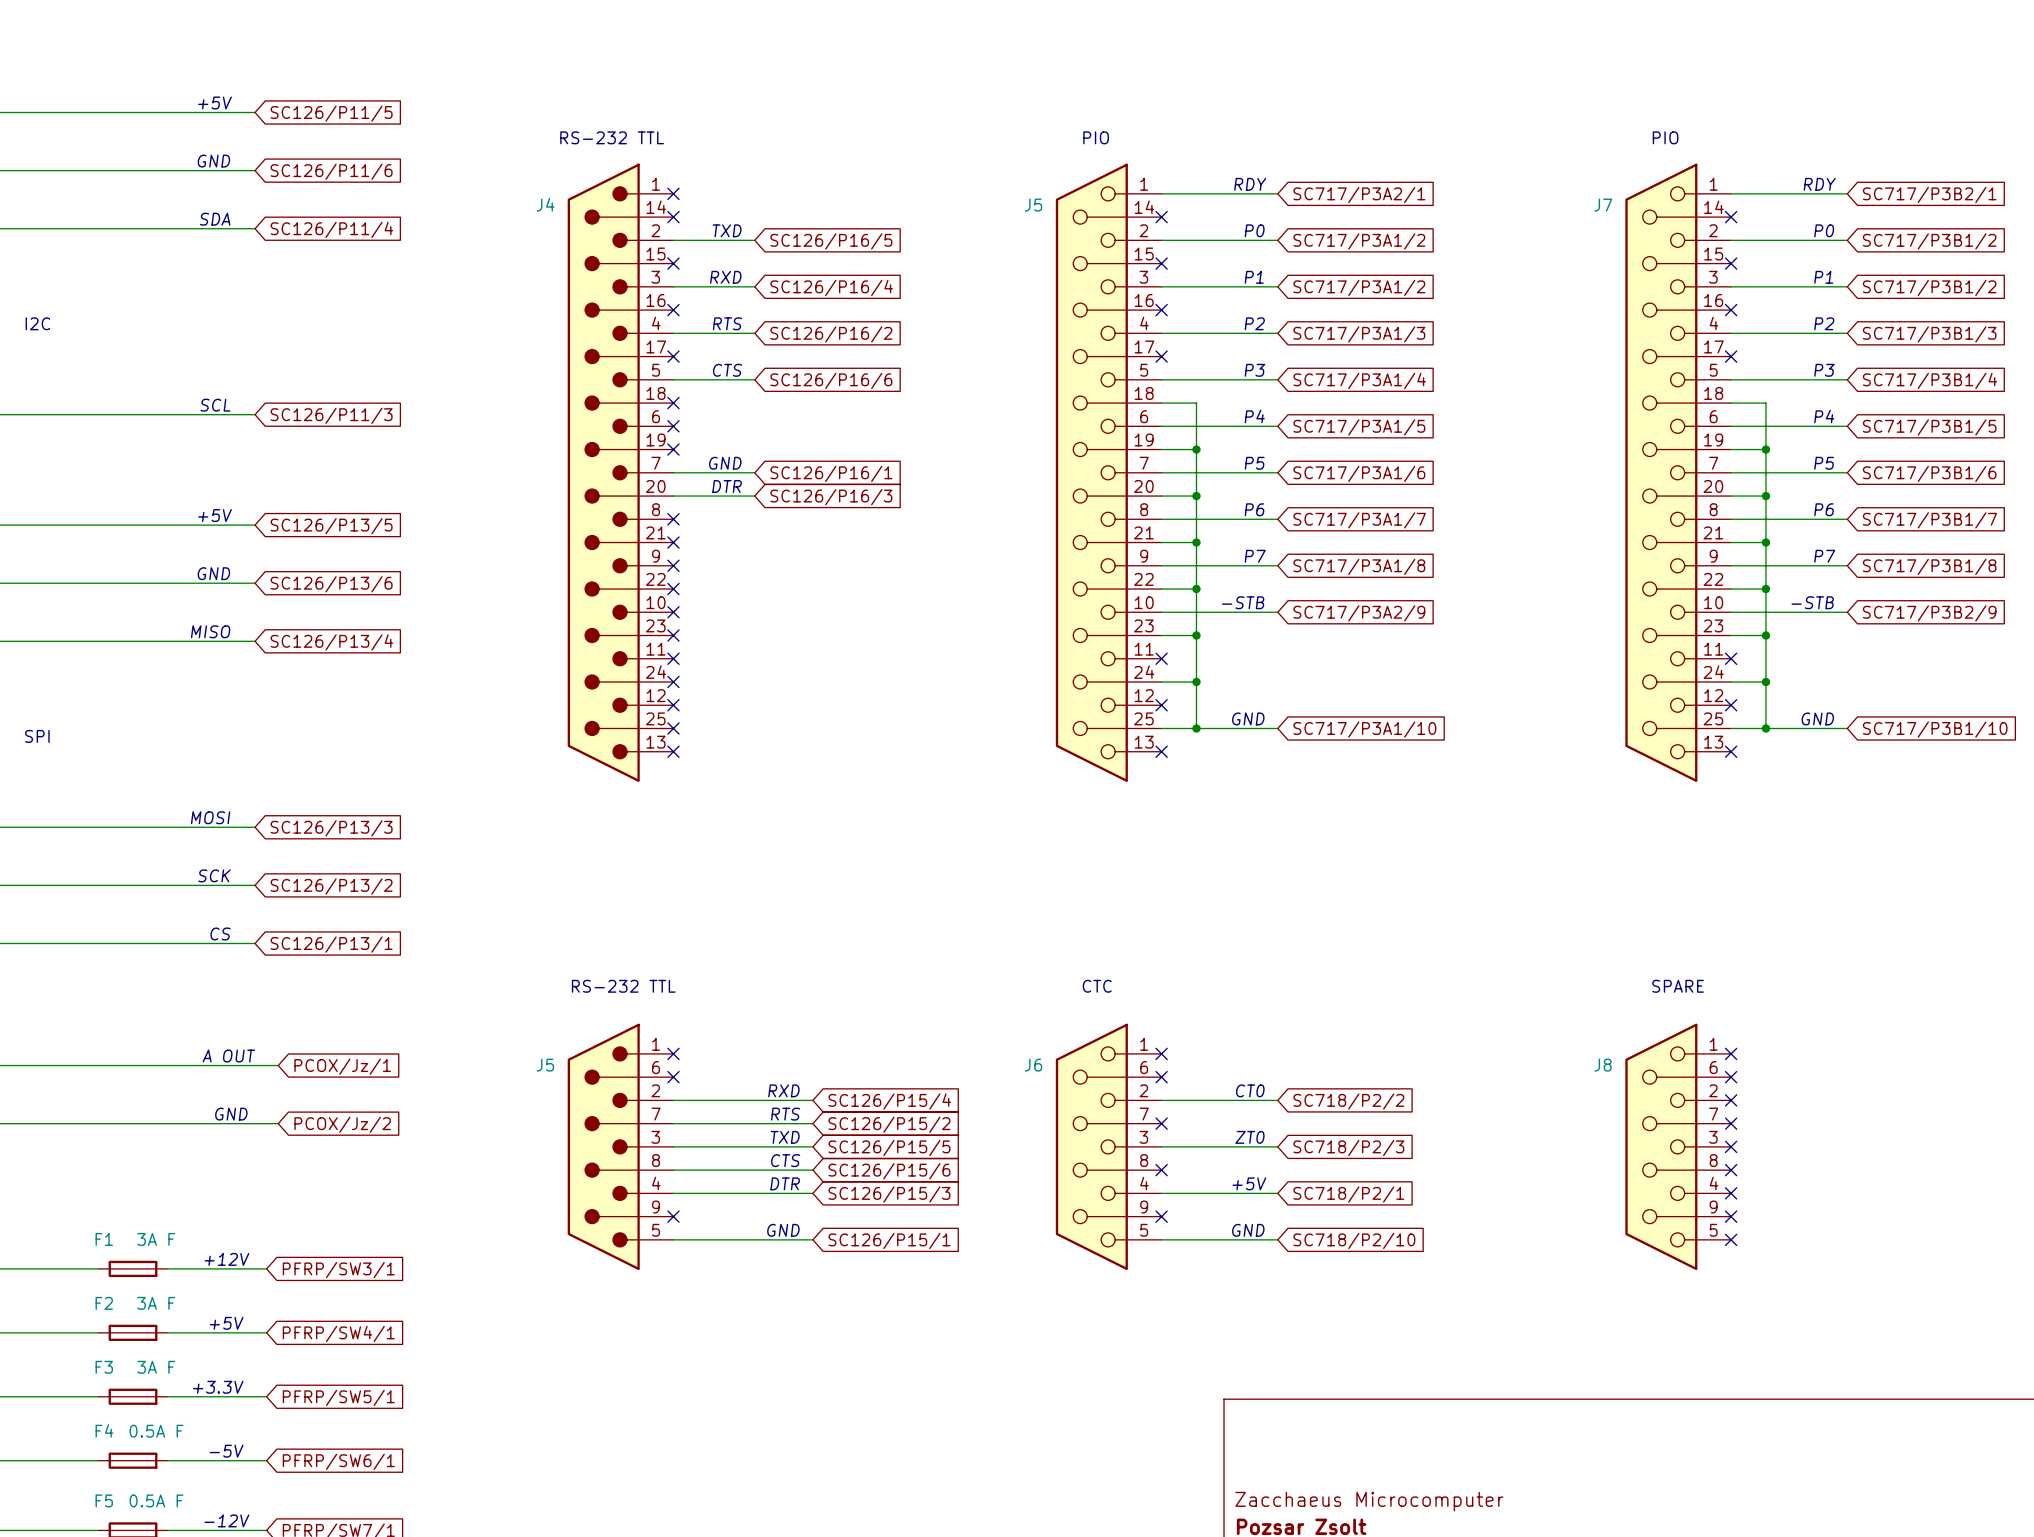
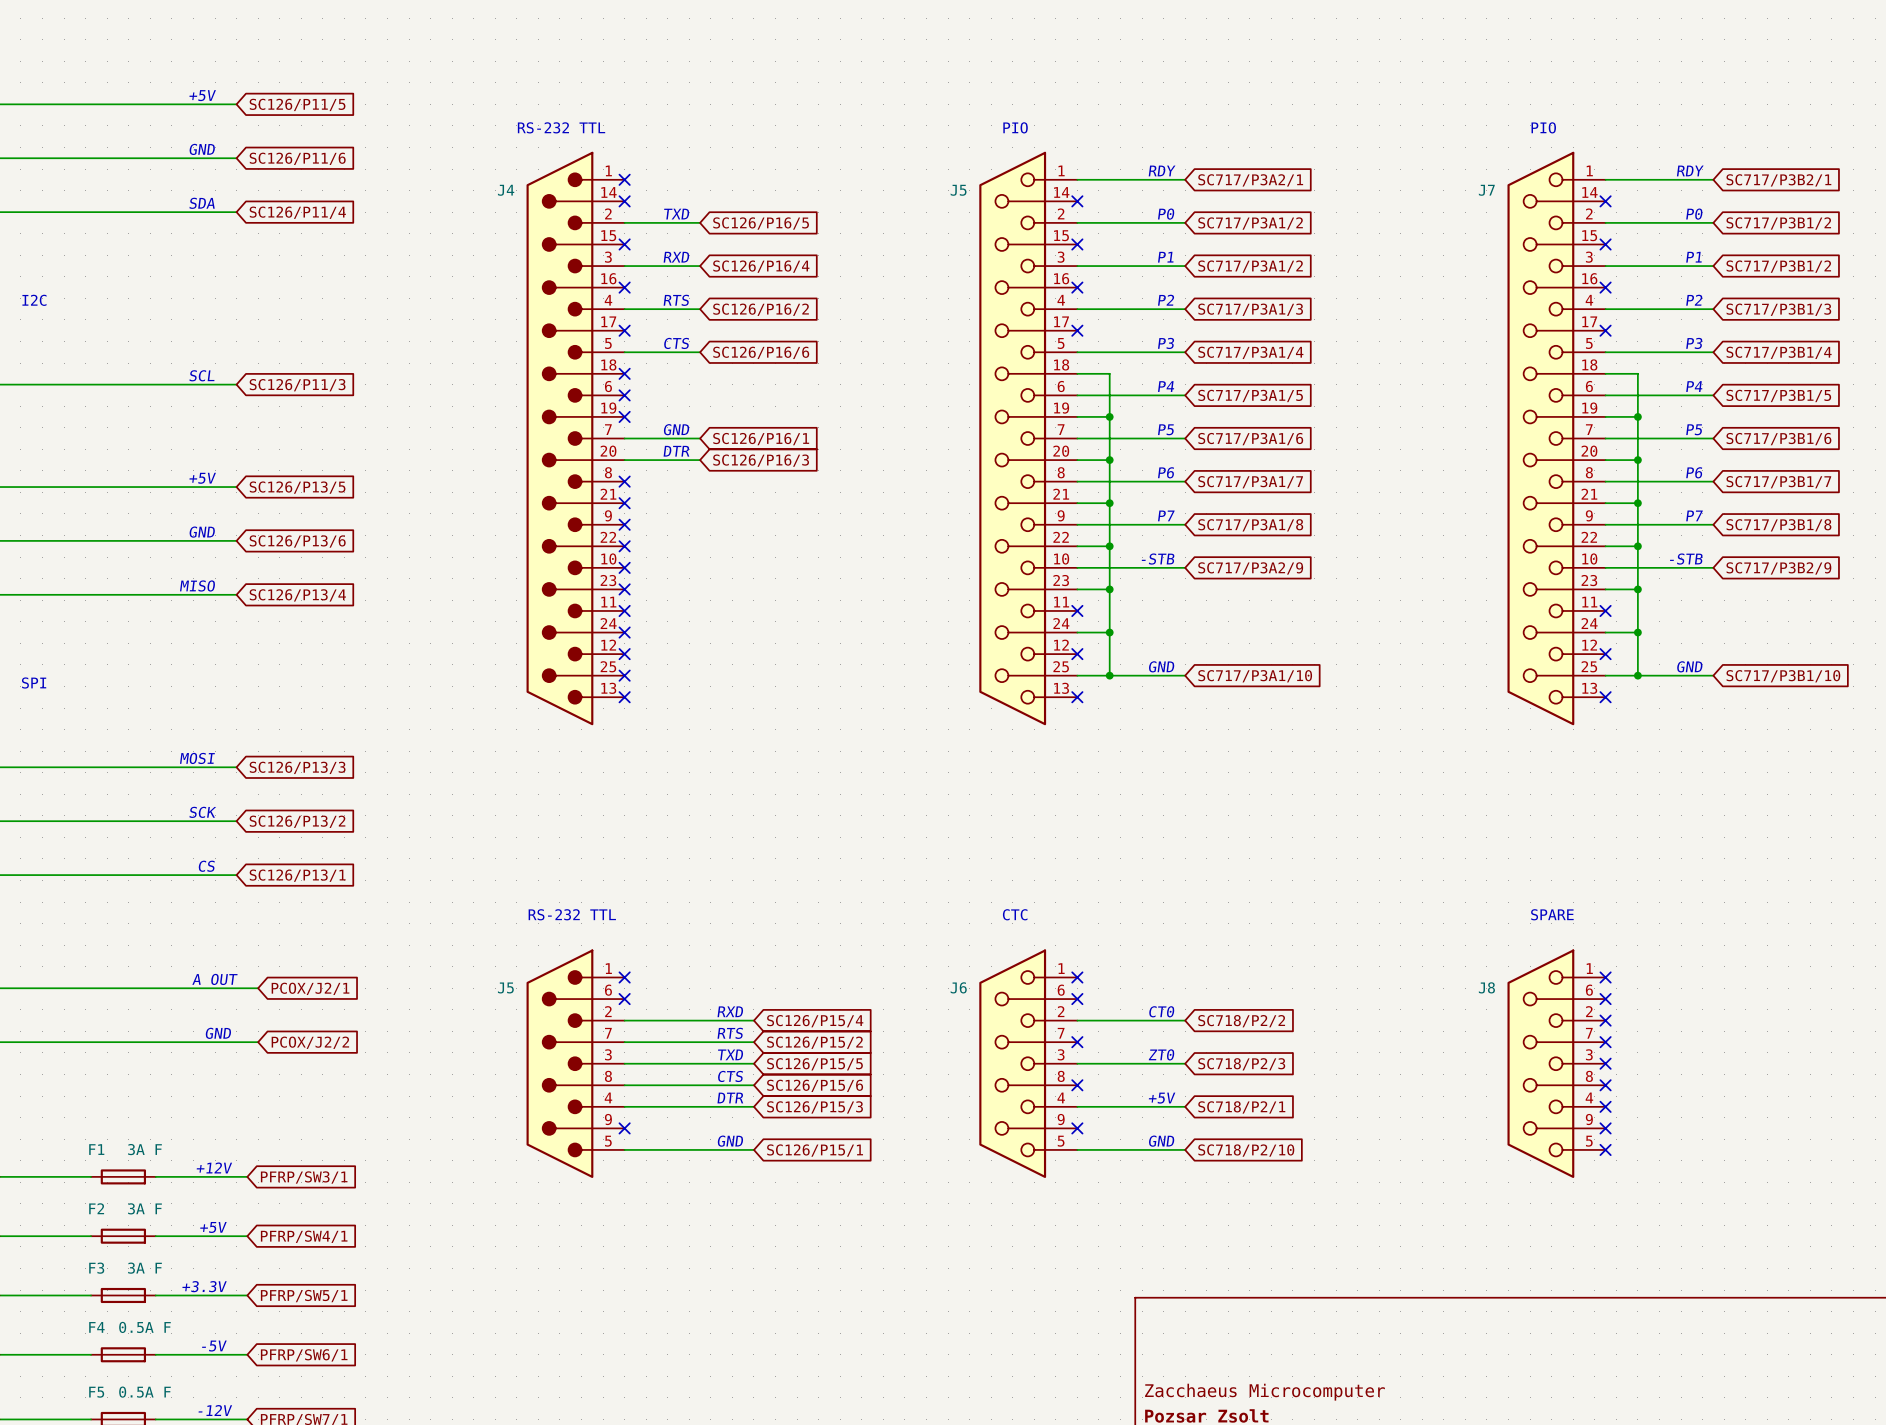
global label: PCOX/Jz/1 (342, 1066) -> PCOX/J2/1 (310, 988)
global label: PCOX/Jz/2 (342, 1124) -> PCOX/J2/2 (310, 1042)

